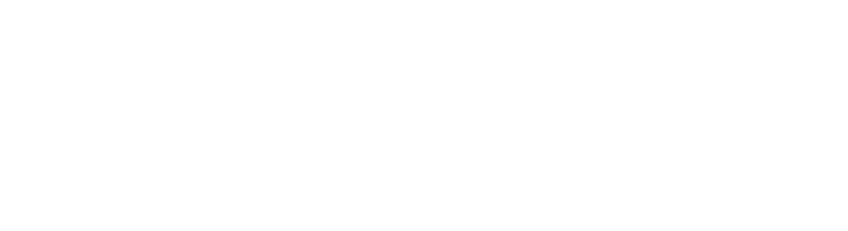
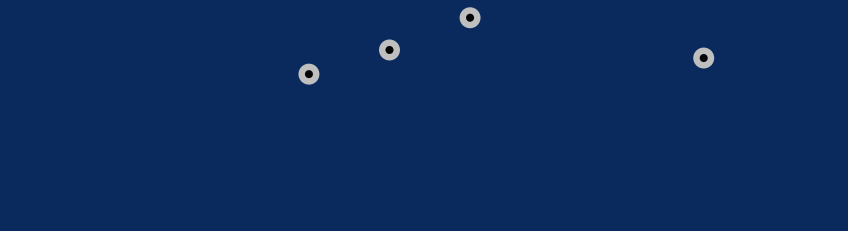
via: none -> (470, 17)
via: none -> (389, 49)
via: none -> (703, 58)
via: none -> (308, 74)

